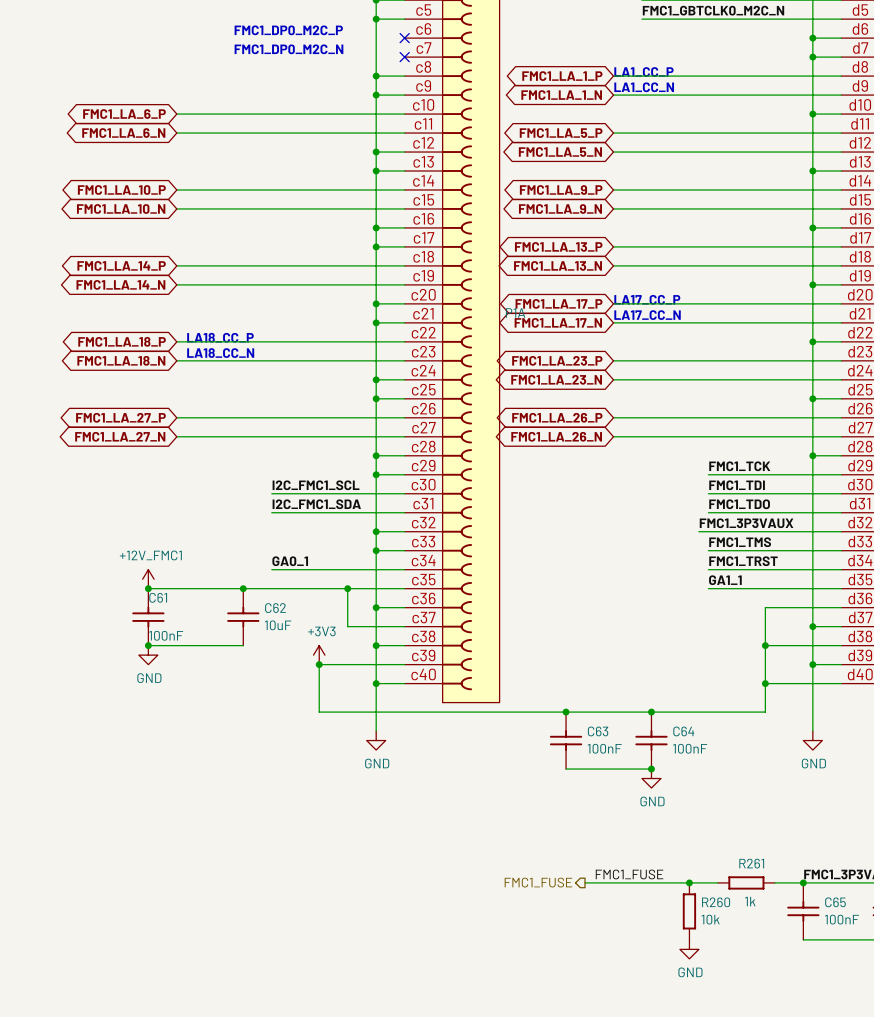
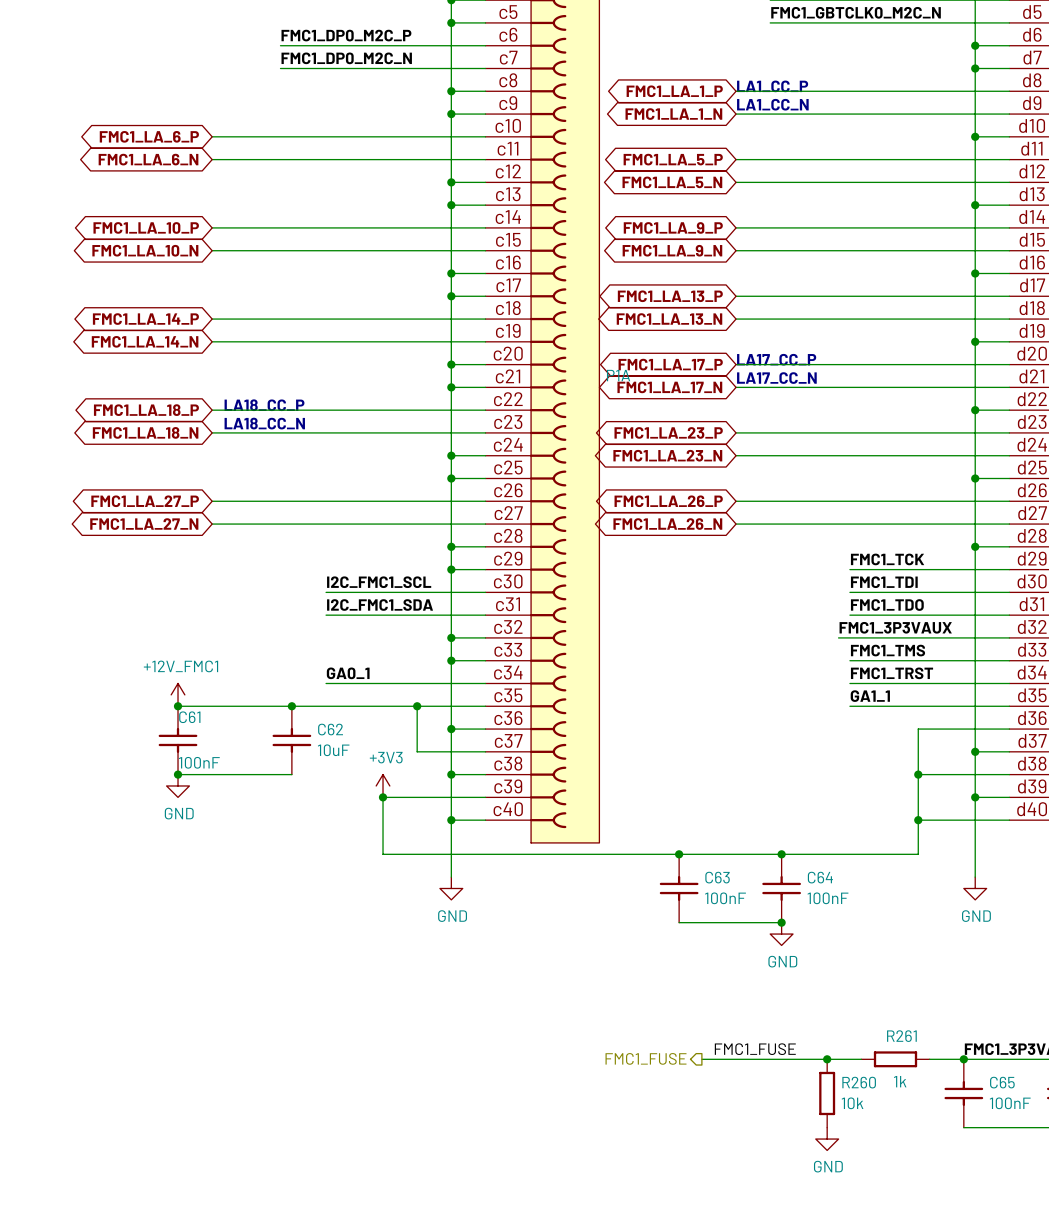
label: none -> FMC1_DP0_M2C_P (346, 35)
text: FMC1_DP0_M2C_P (288, 30) -> none
wire: none -> (280, 45) (485, 45)
no-connect mark: (404, 38) -> none
label: none -> FMC1_DP0_M2C_N (346, 58)
text: FMC1_DP0_M2C_N (288, 49) -> none
wire: none -> (280, 68) (485, 68)
no-connect mark: (404, 57) -> none

